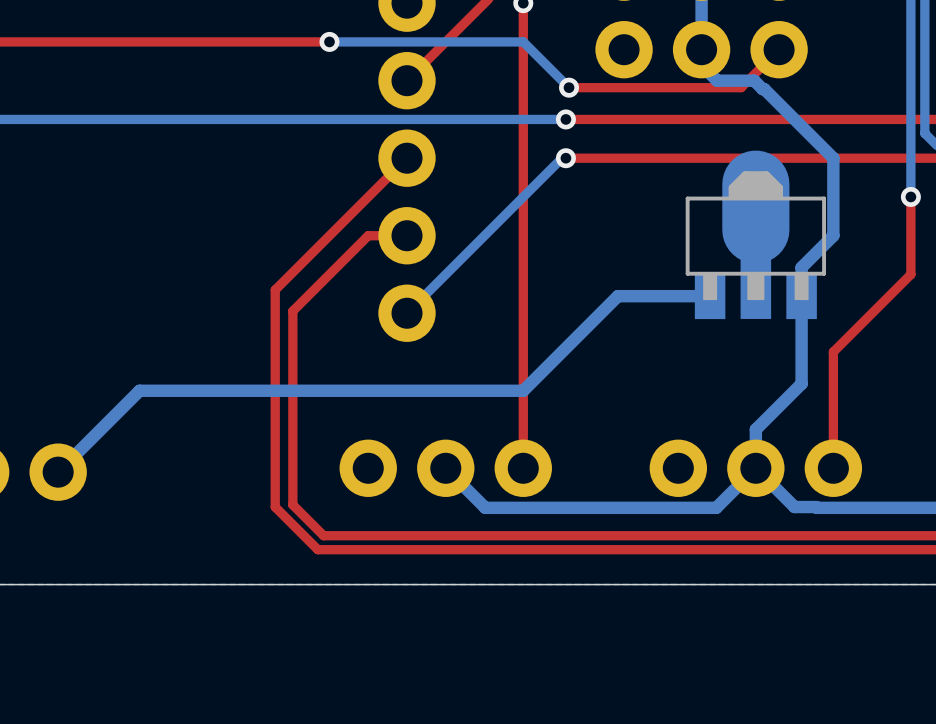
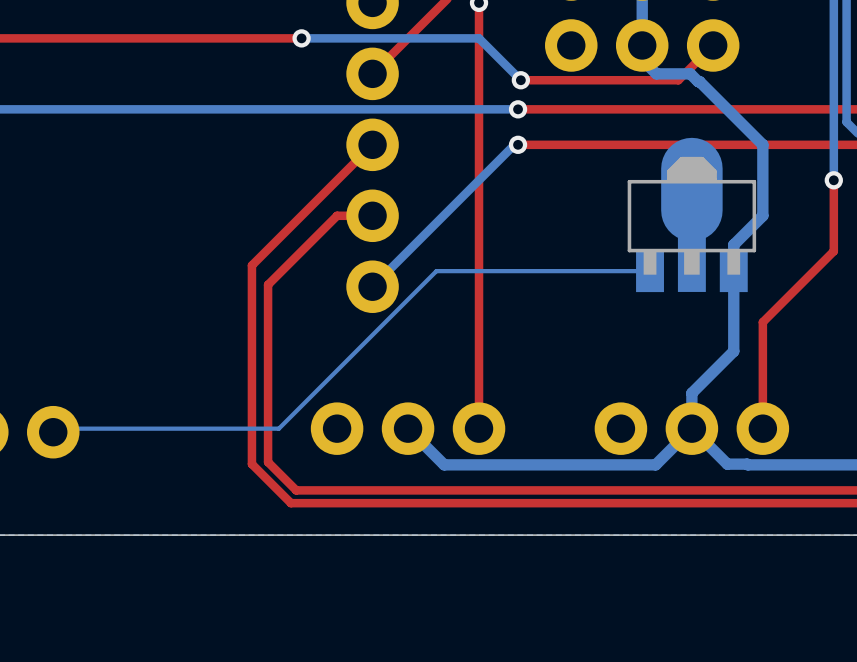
bottom track: (617, 296) (523, 390) (139, 390) (58, 472) -> (565, 271) (436, 271) (278, 428) (53, 428) (53, 432)
bottom track width: thick (710, 296) (617, 296) -> thin (650, 271) (565, 271)

